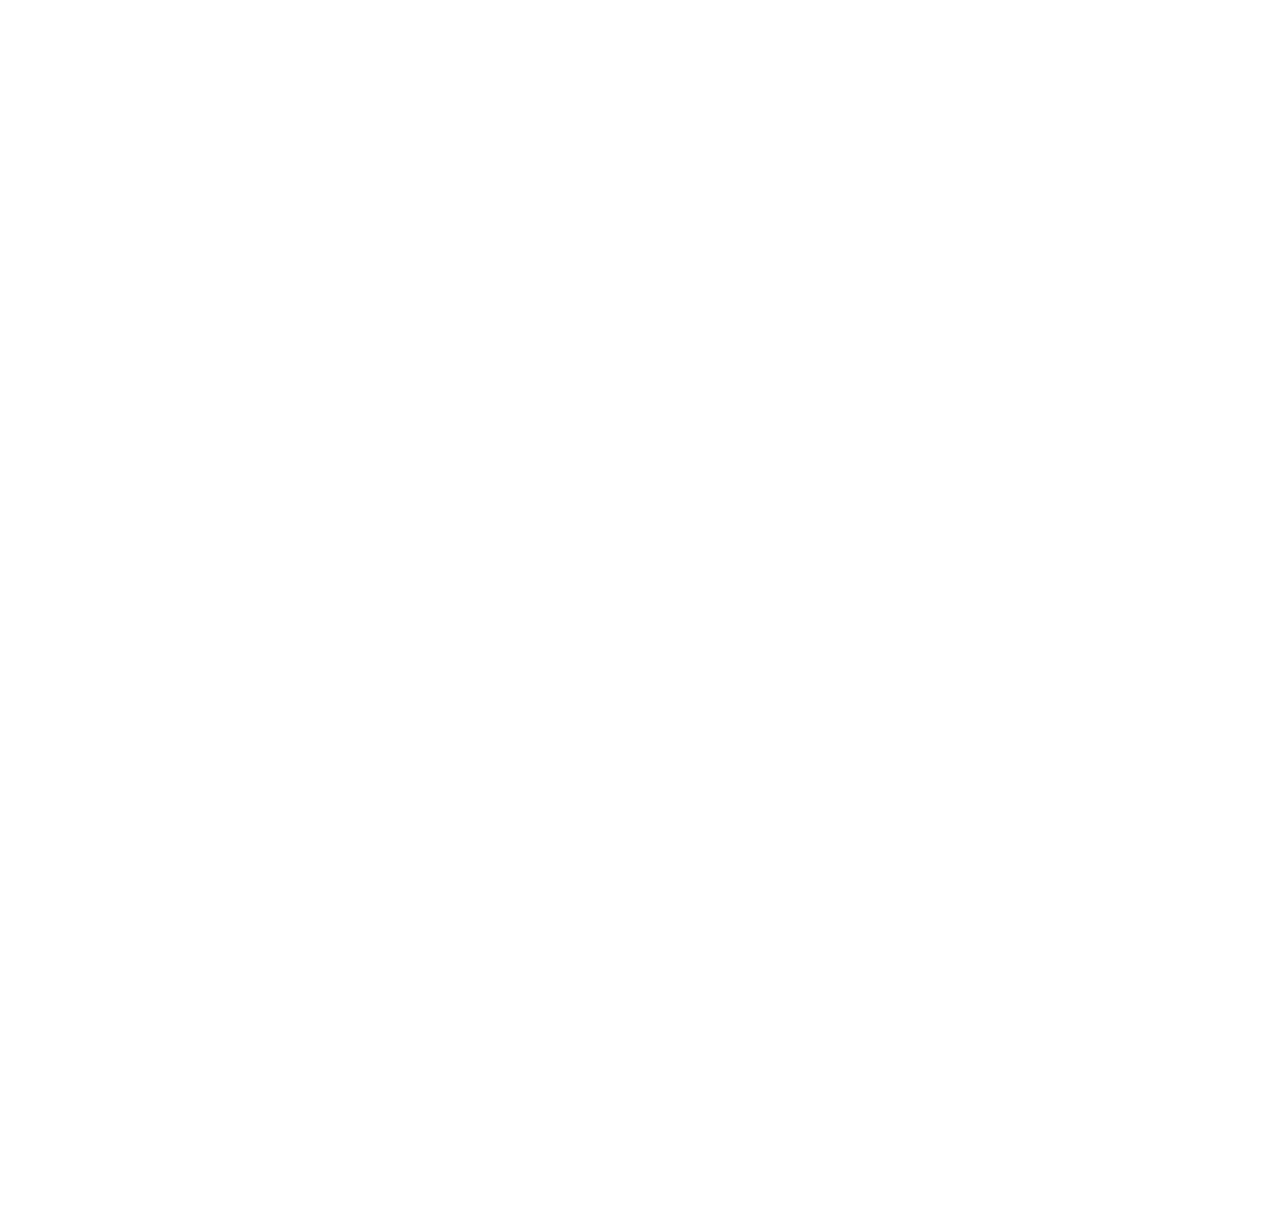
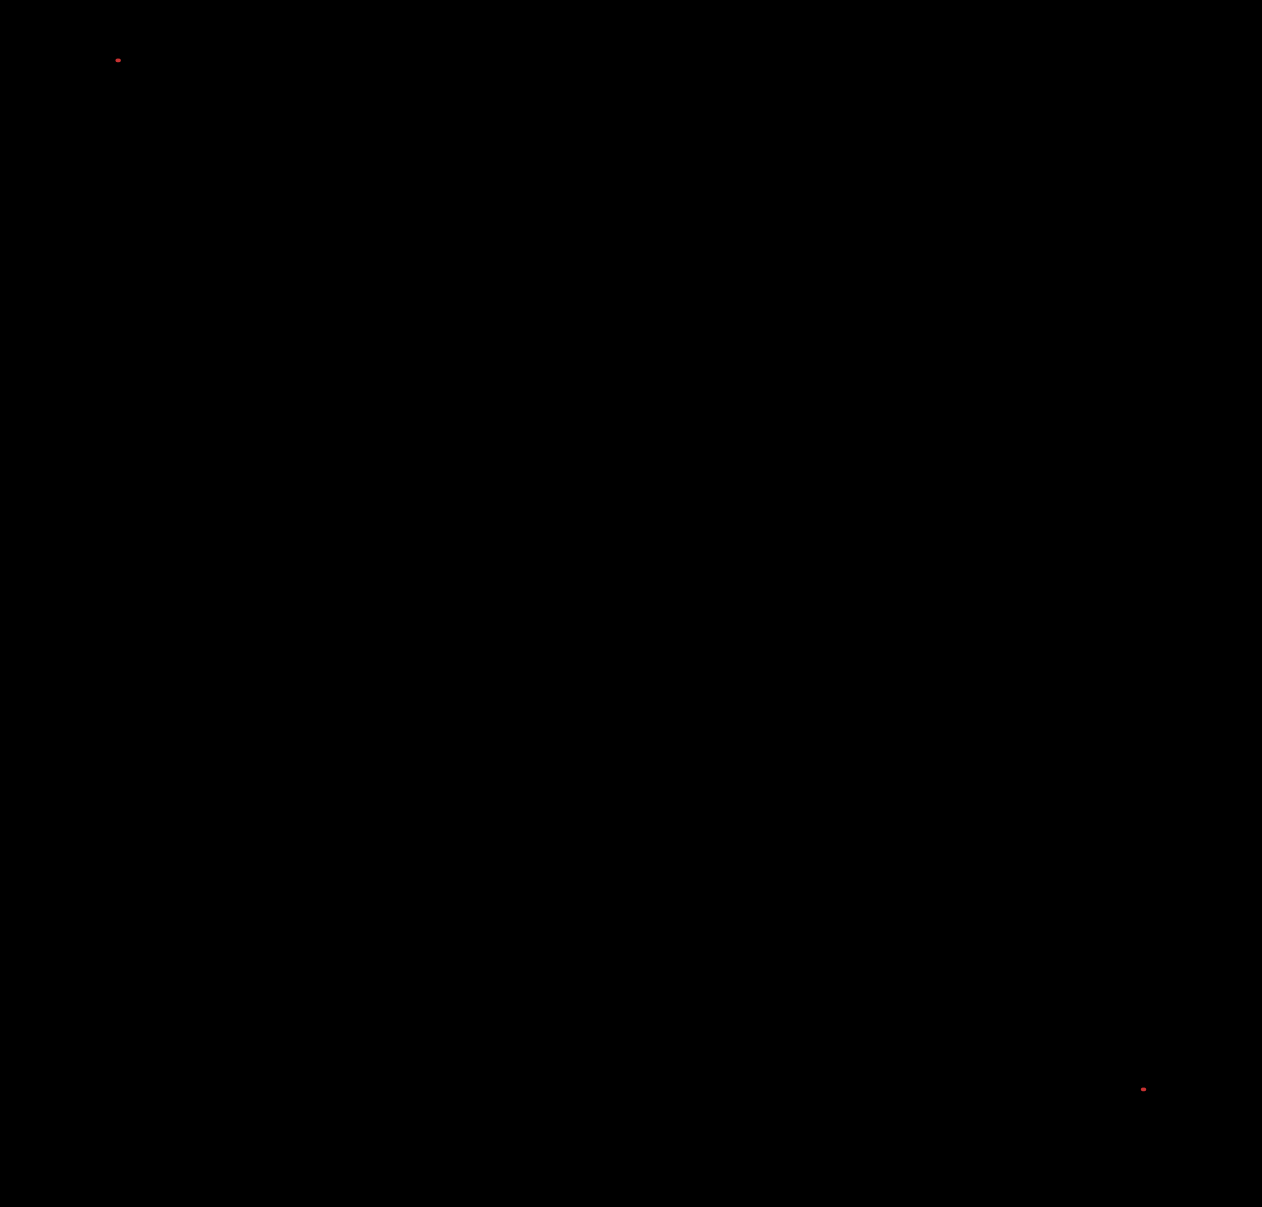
track: none -> (117, 60) (119, 60)
track: none -> (1142, 1089) (1144, 1089)

